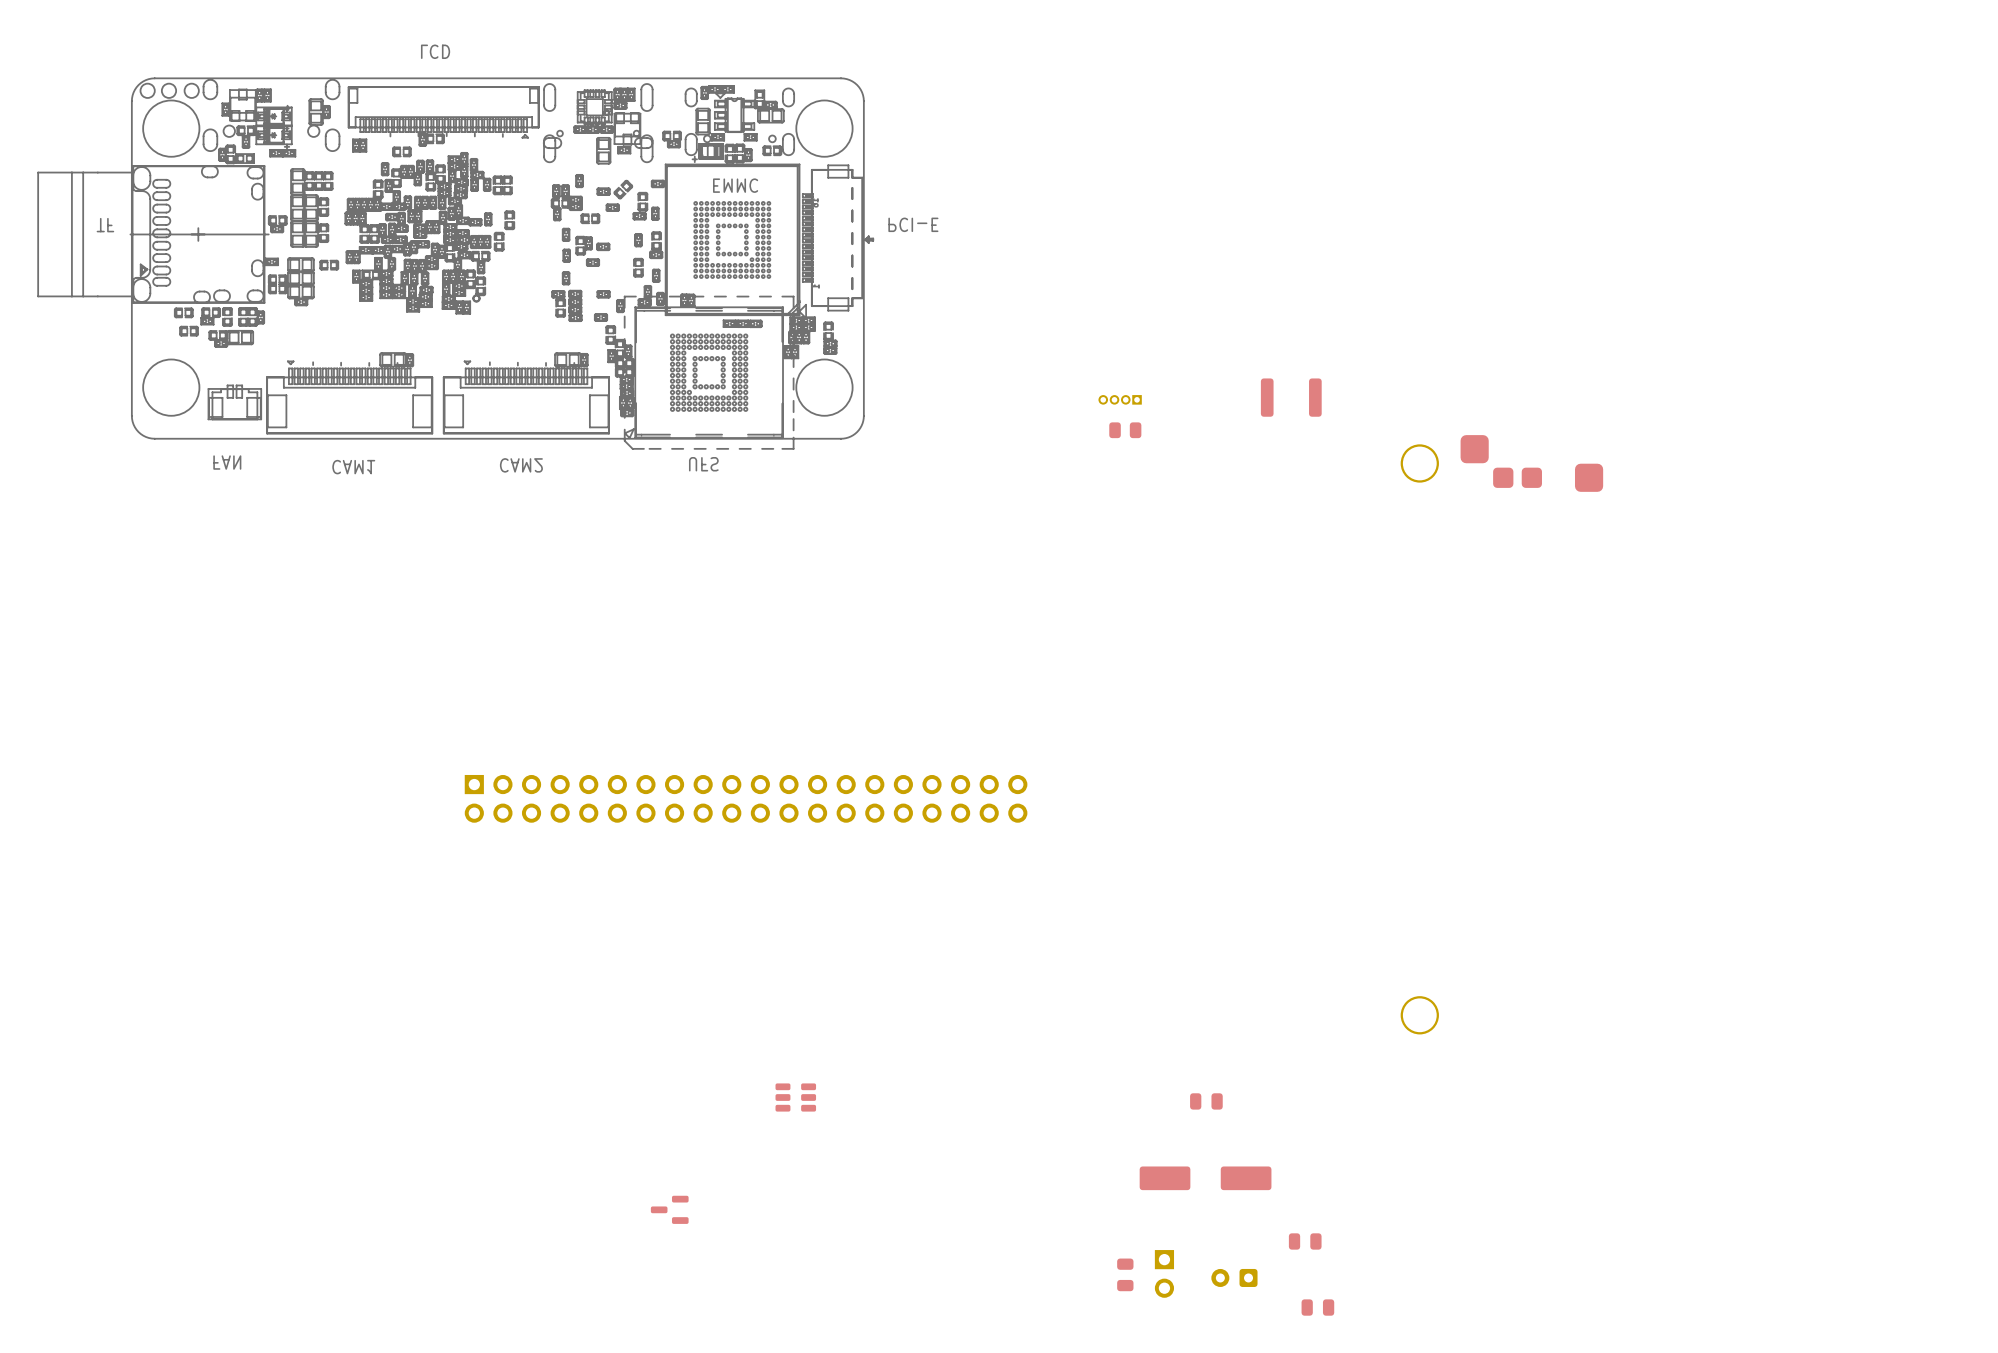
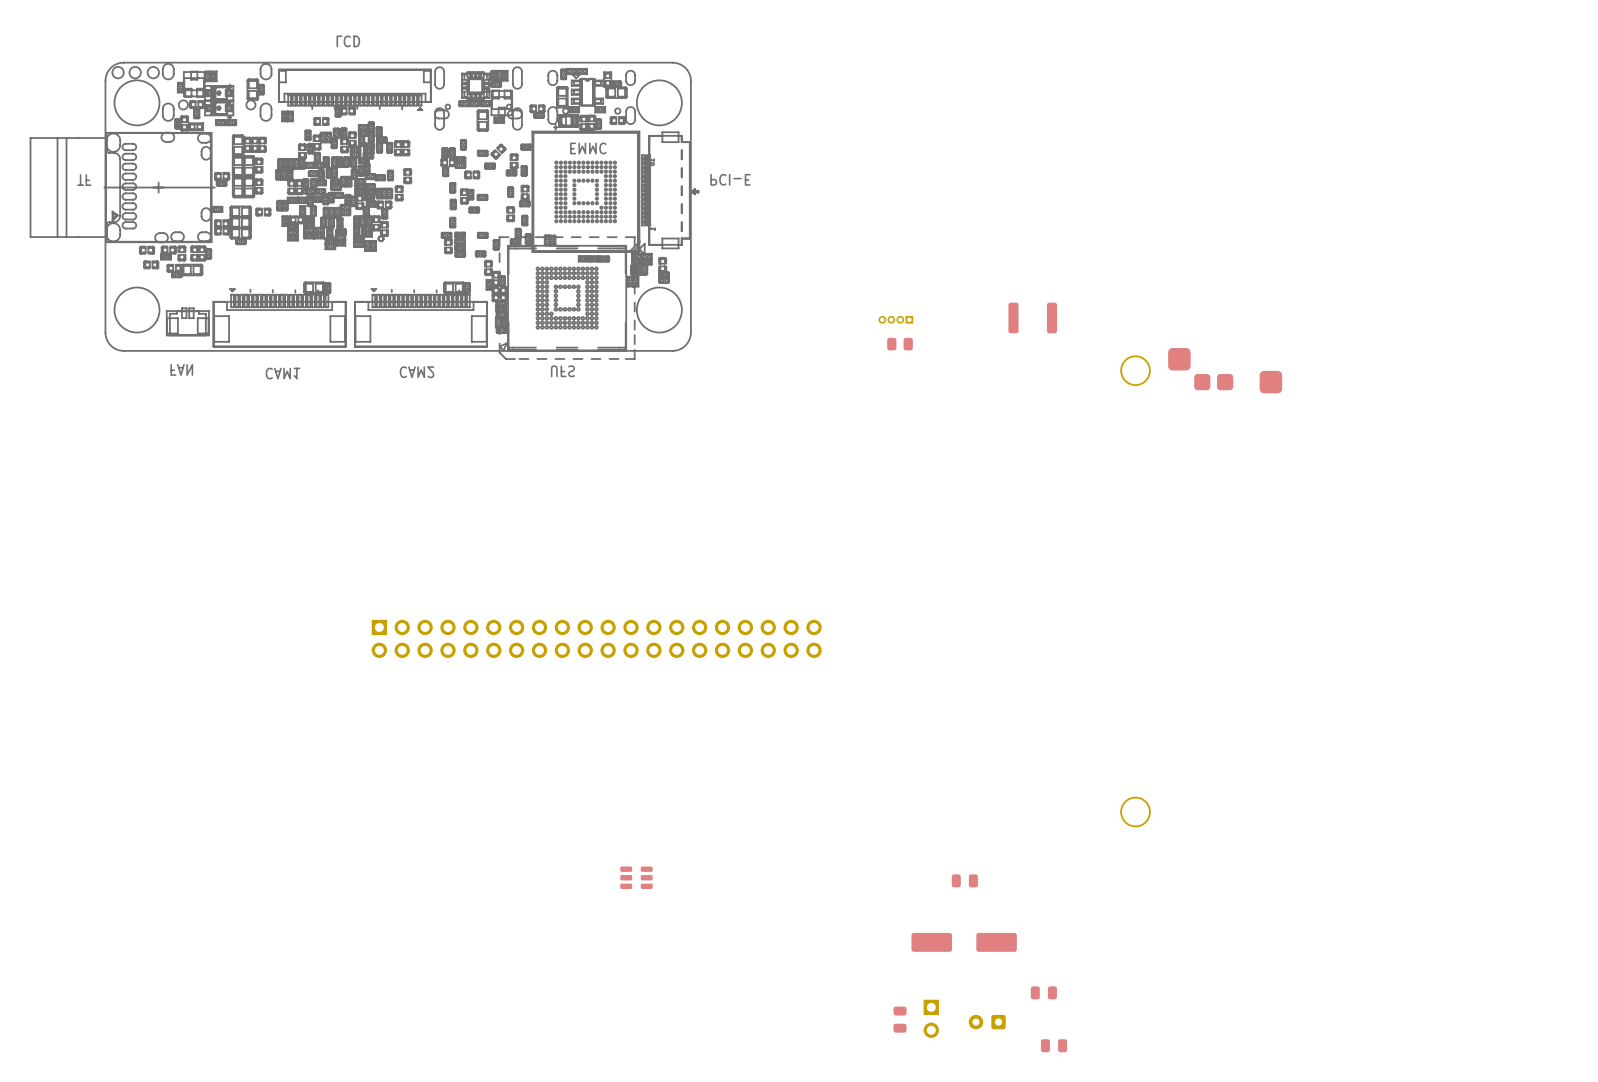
part: (669, 1209) -> none

